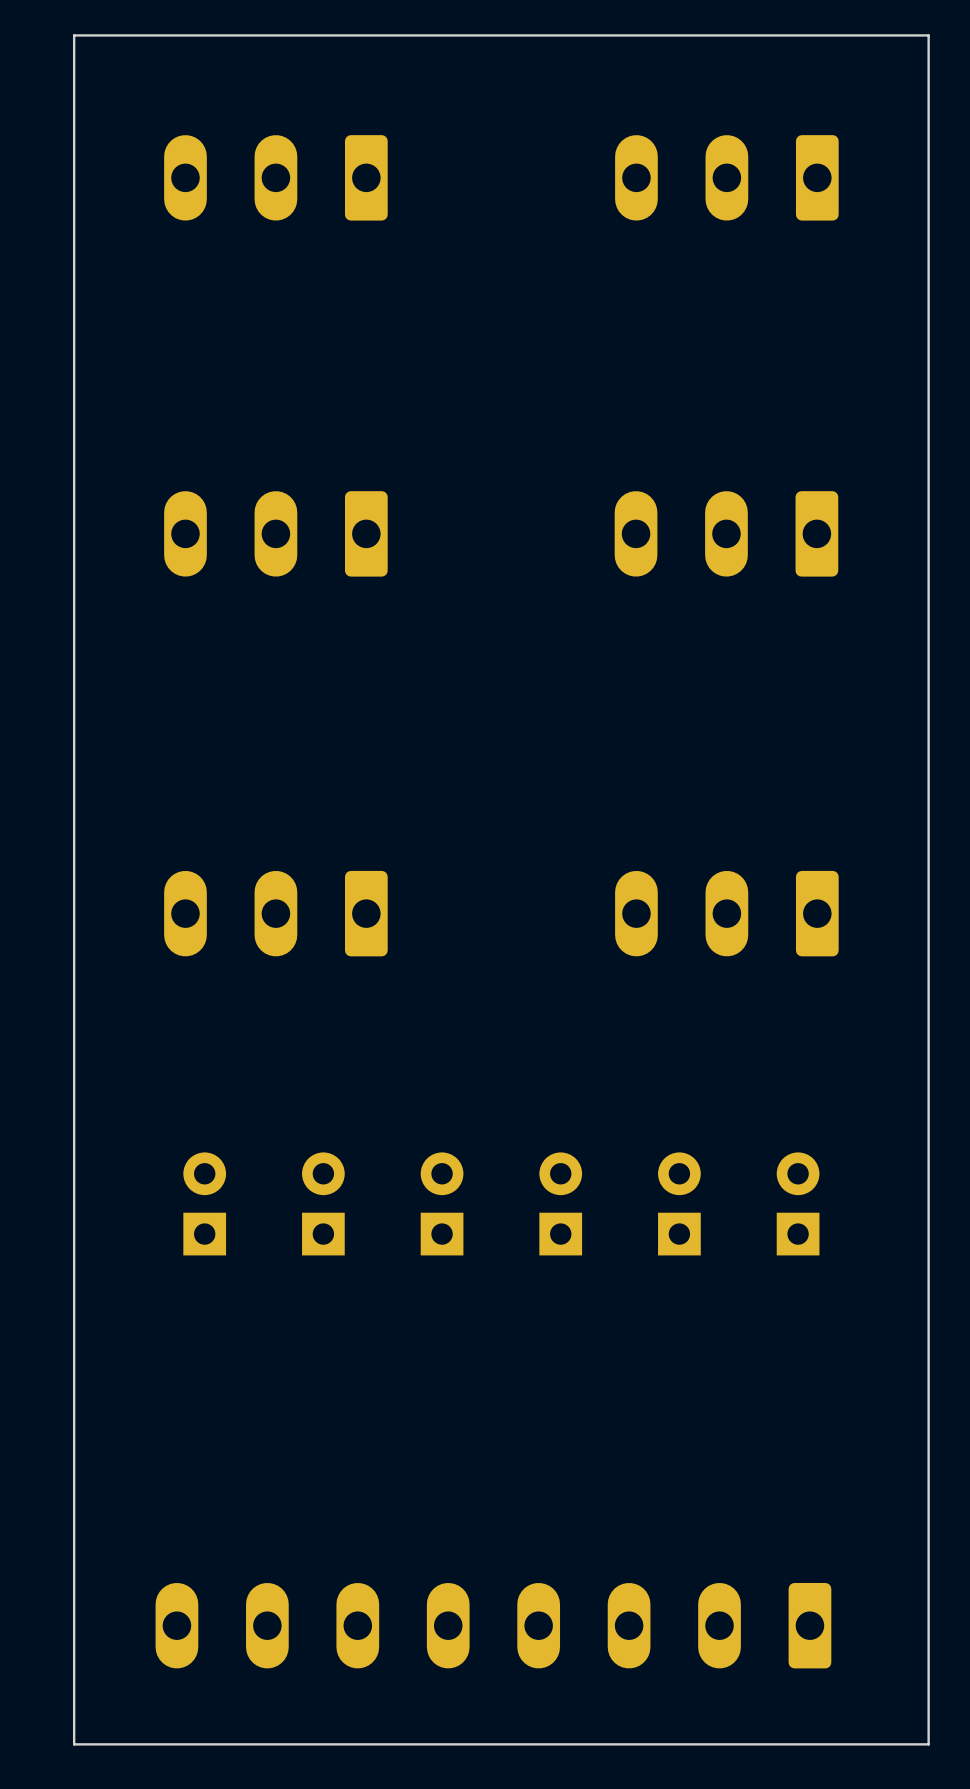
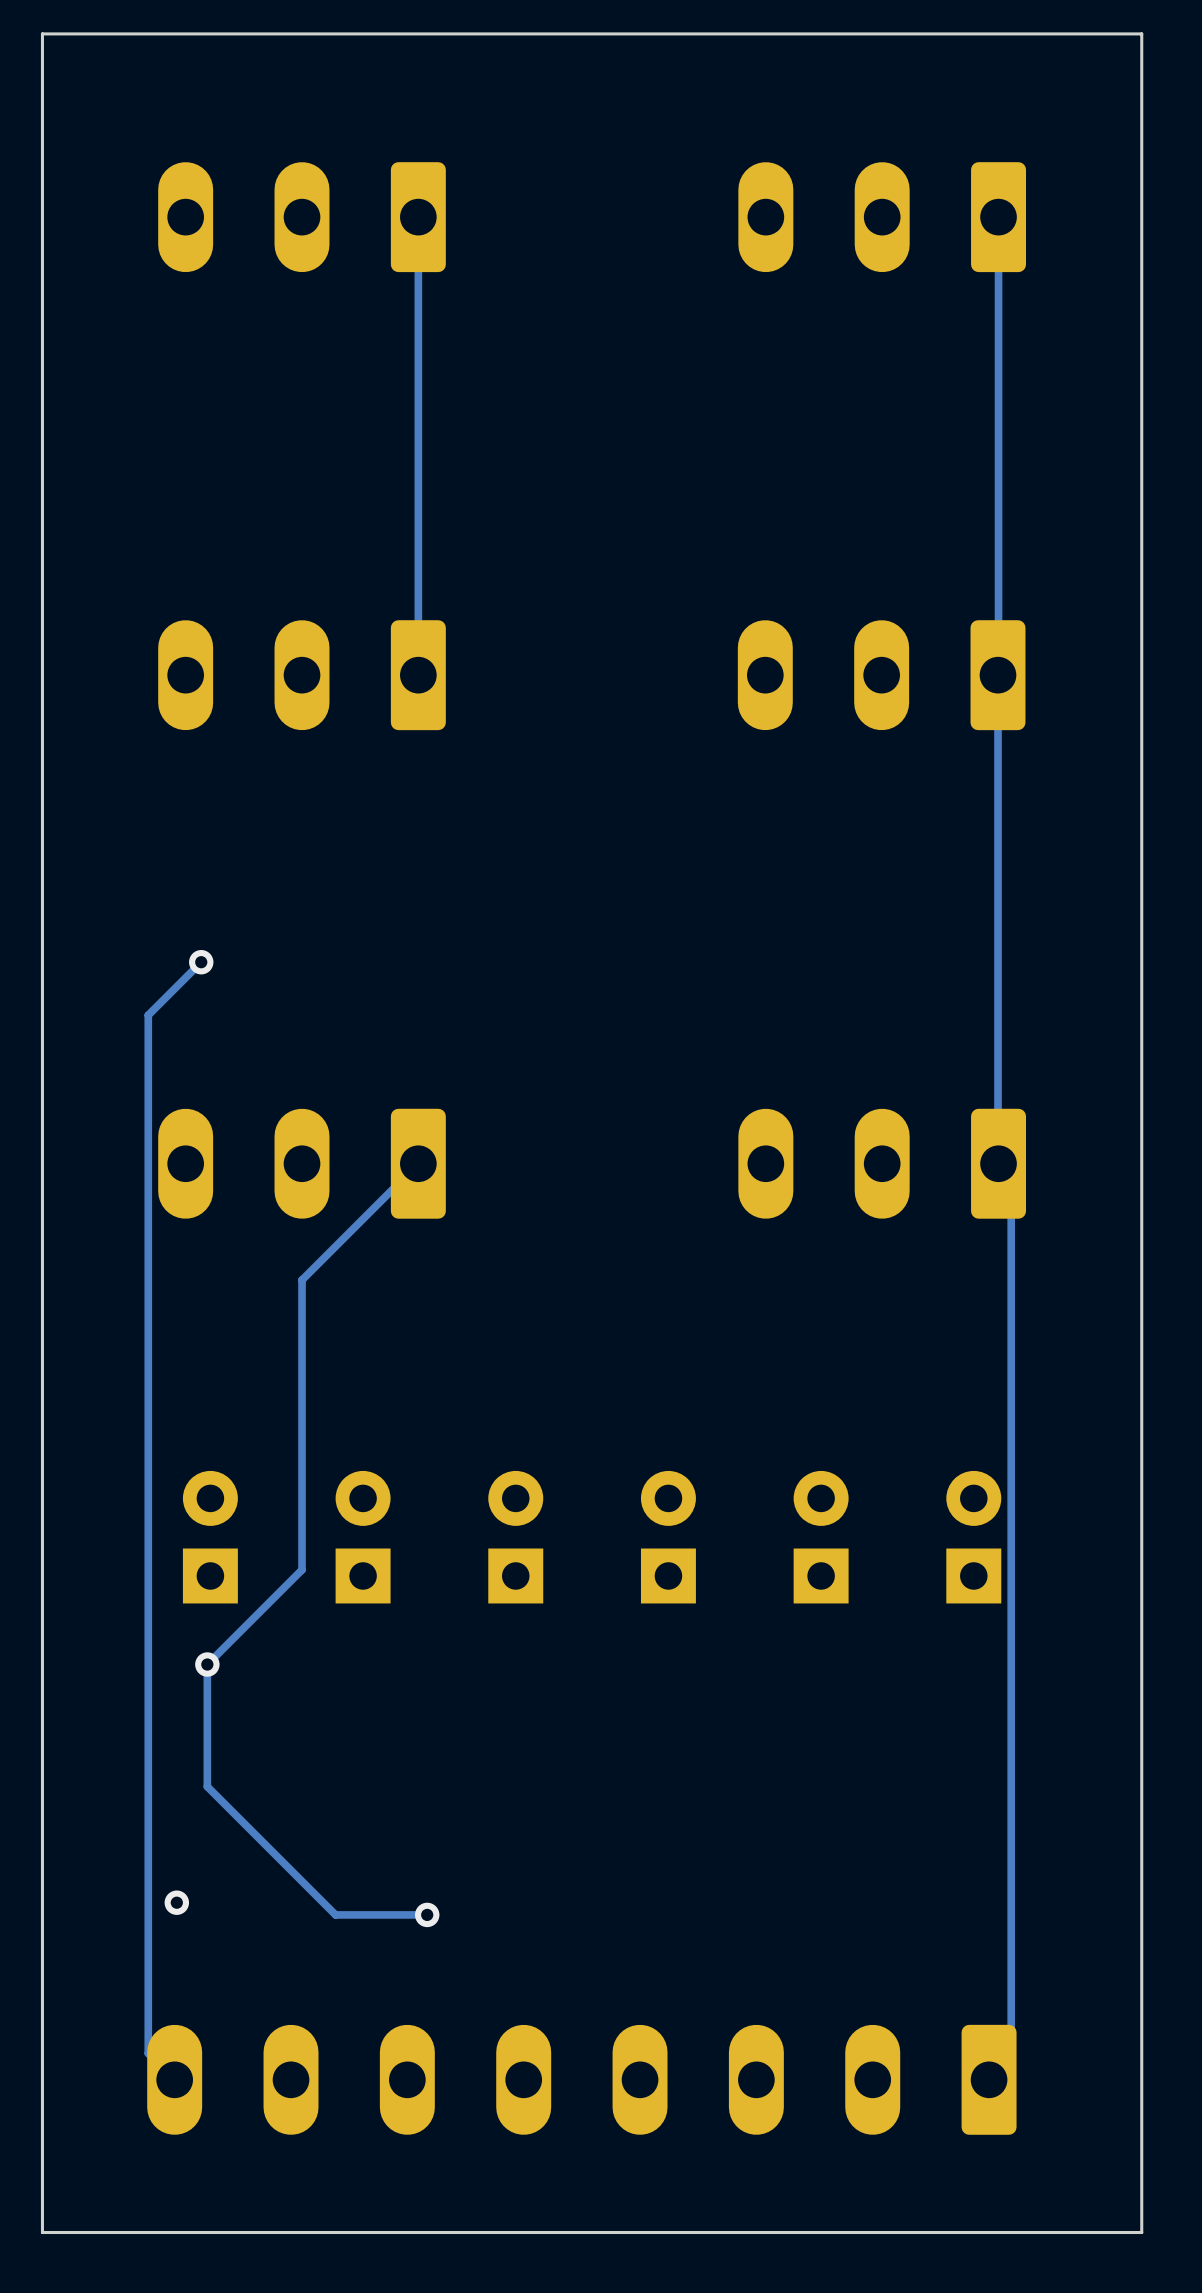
track: none -> (418, 217) (418, 675)
track: none -> (998, 217) (998, 1140) (998, 1163) (1011, 1176) (1011, 2057) (989, 2079)
track: none -> (201, 962) (148, 1015) (148, 2053) (174, 2079)
via: none -> (201, 962)
track: none -> (418, 1163) (302, 1280) (302, 1569) (207, 1664) (207, 1786) (335, 1914) (427, 1914)
via: none -> (207, 1664)
via: none -> (176, 1902)
via: none -> (427, 1914)

